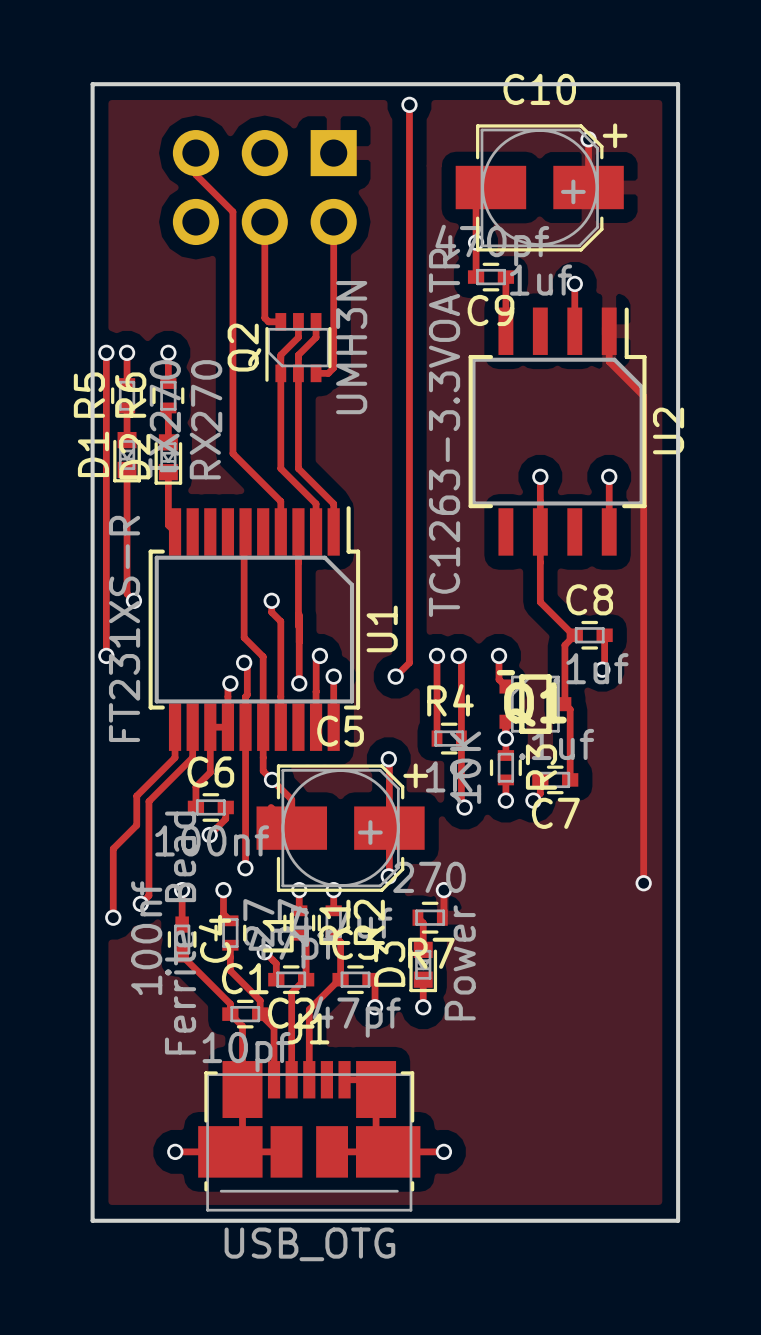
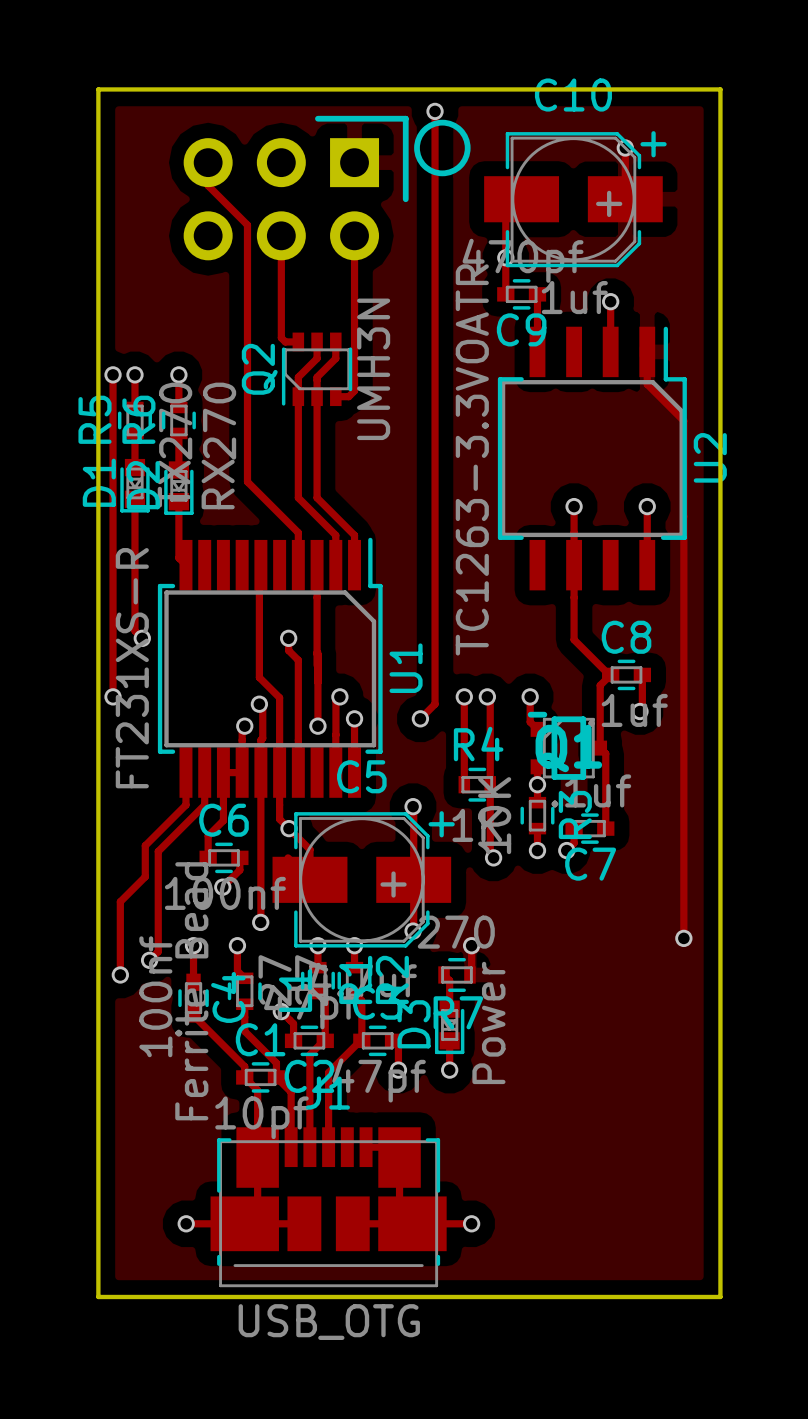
line: none -> (317, 118) (405, 118) (405, 199)
drawing: none -> [414, 119, 471, 177]

